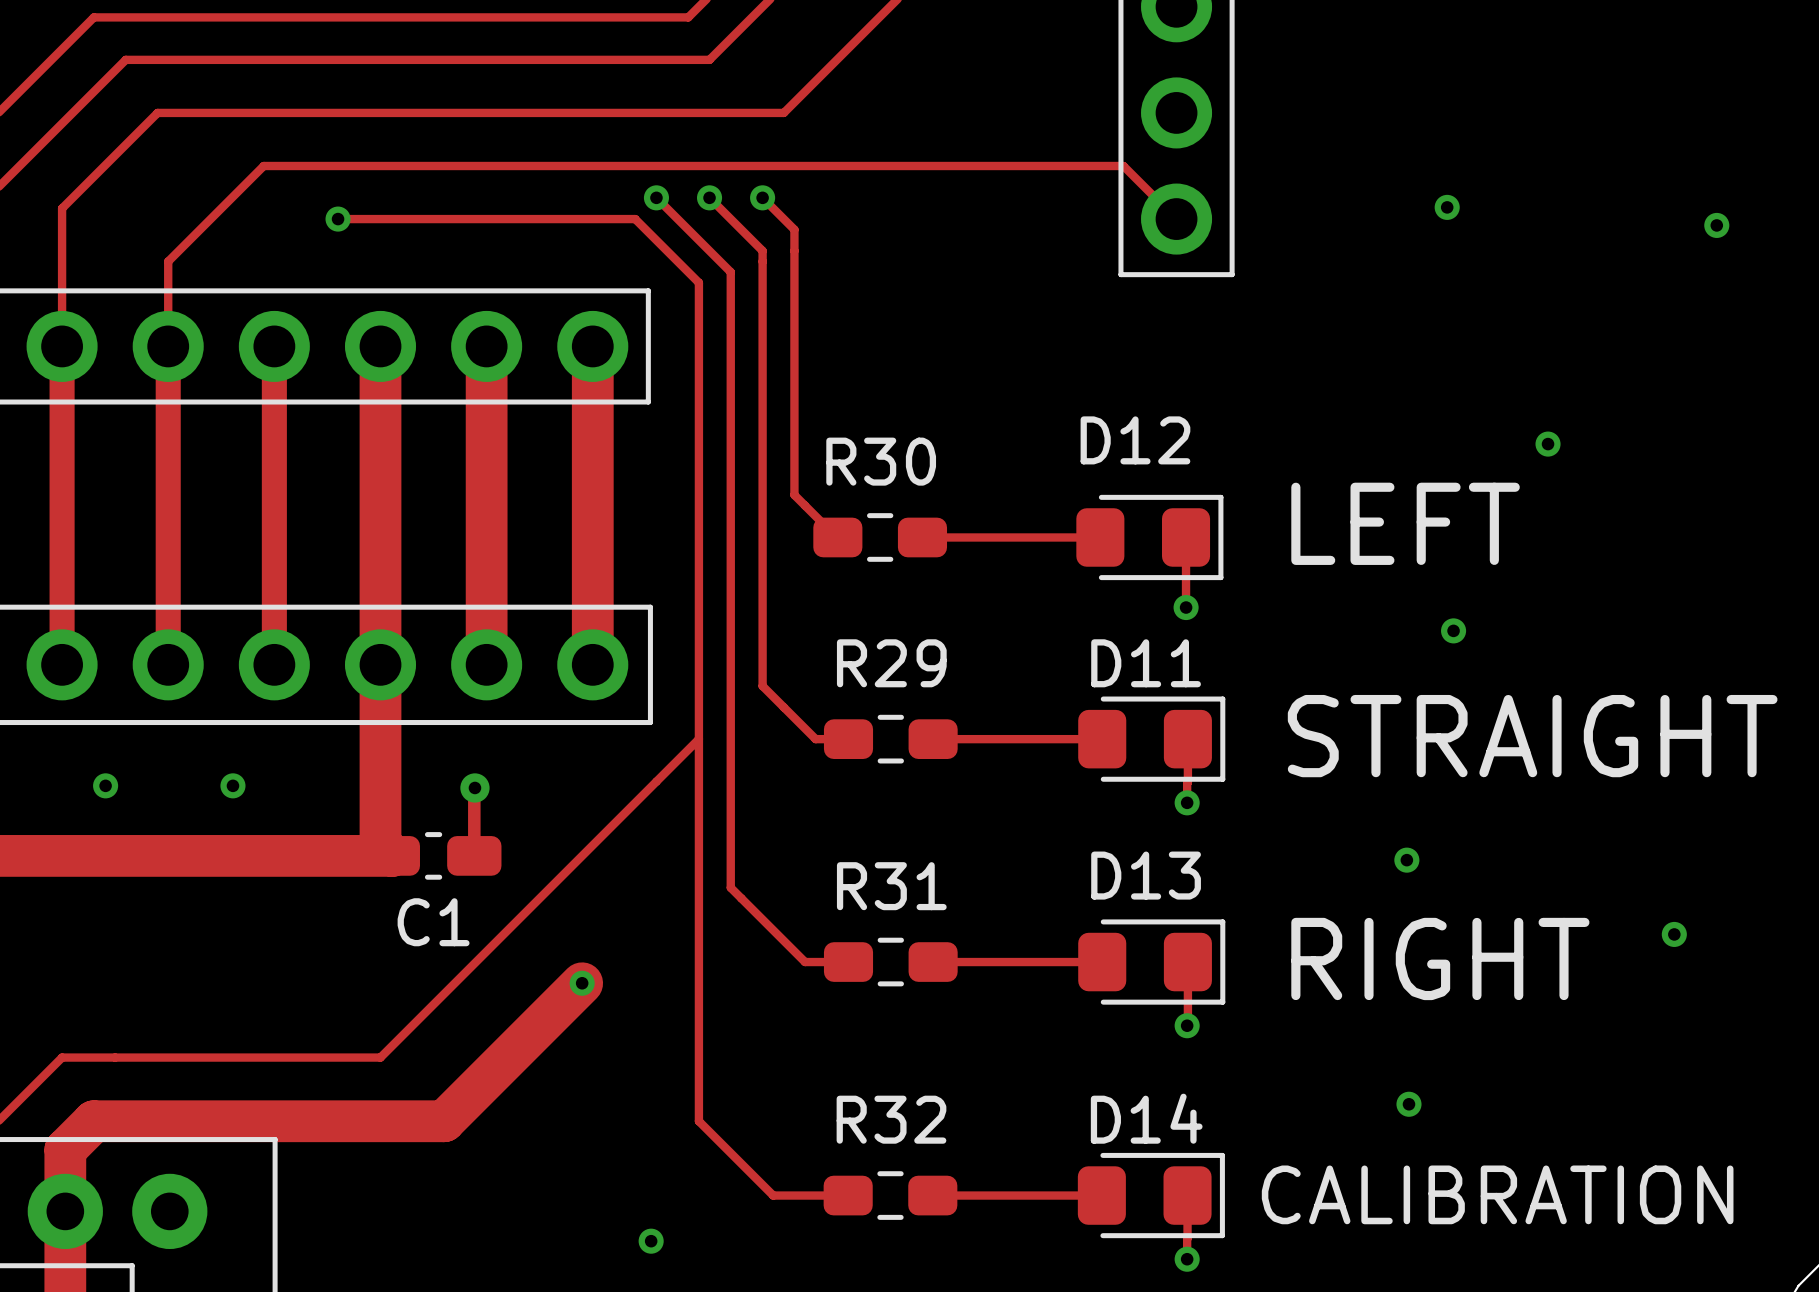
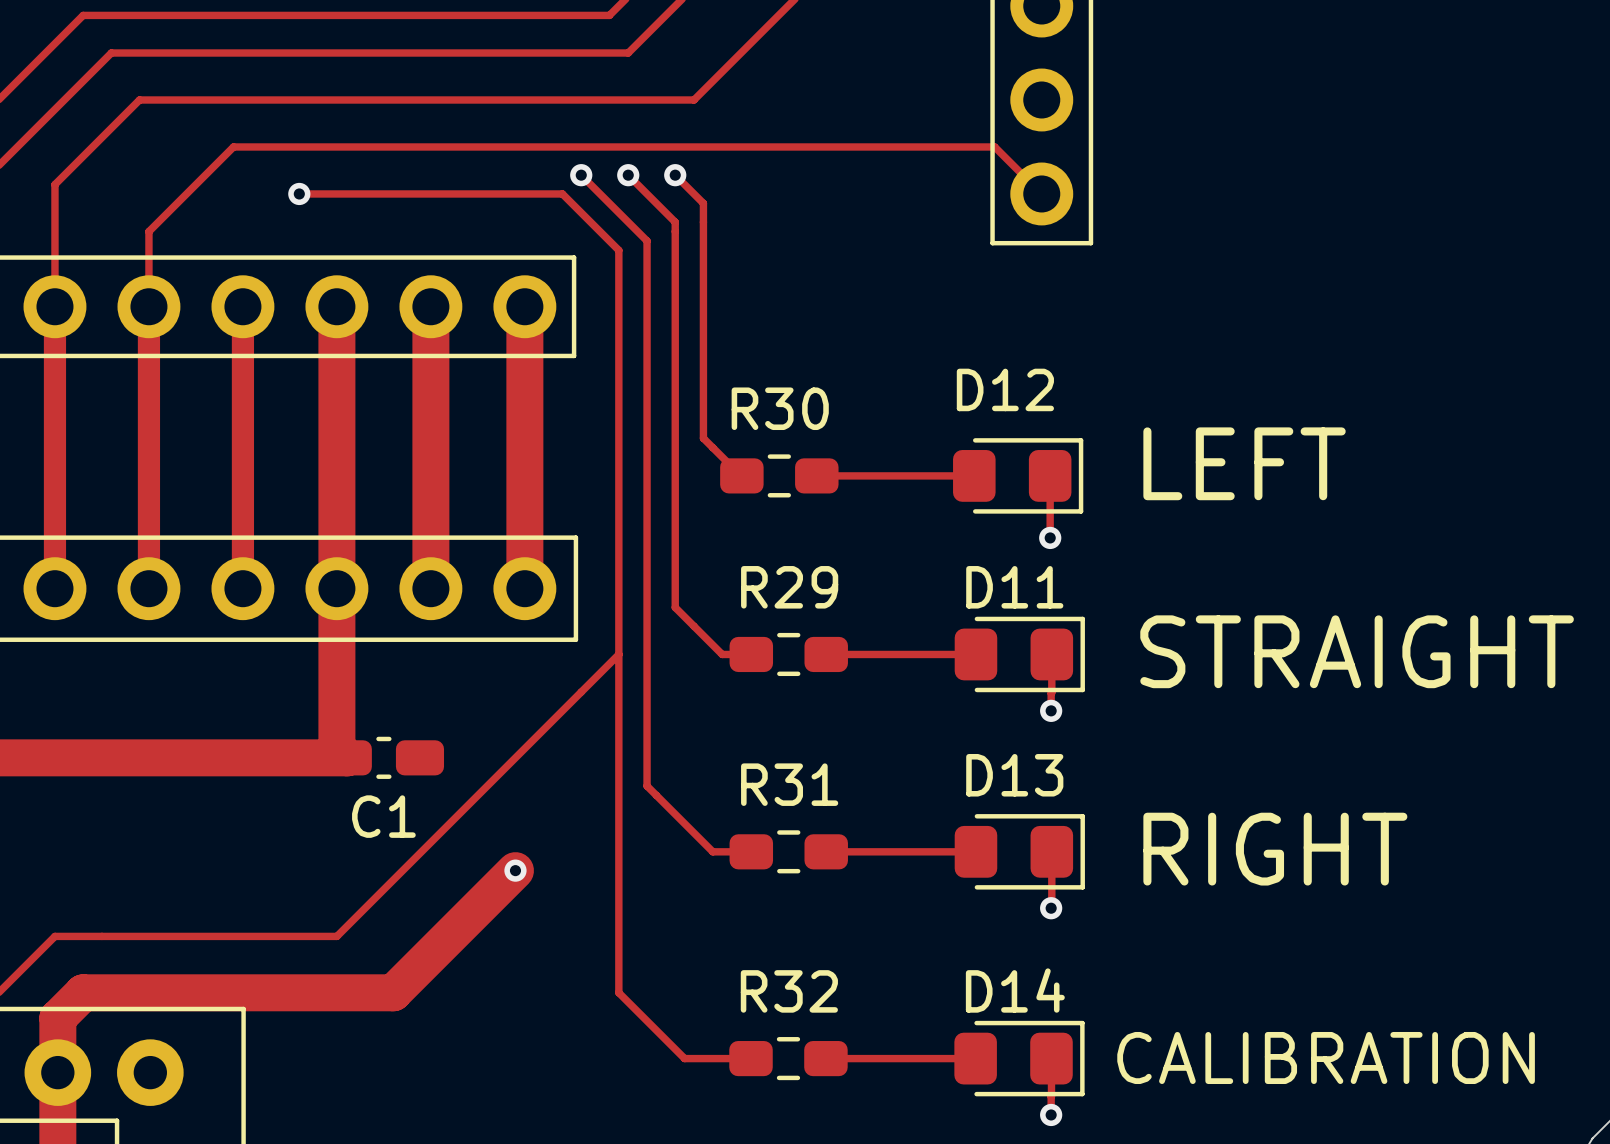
via: (1447, 207) -> none
via: (1716, 225) -> none
via: (1548, 444) -> none
via: (1453, 630) -> none
via: (105, 785) -> none
via: (232, 785) -> none
track: (474, 787) (474, 855) -> none
via: (474, 787) -> none
via: (1406, 860) -> none
via: (1674, 934) -> none
via: (1408, 1104) -> none
via: (651, 1241) -> none

